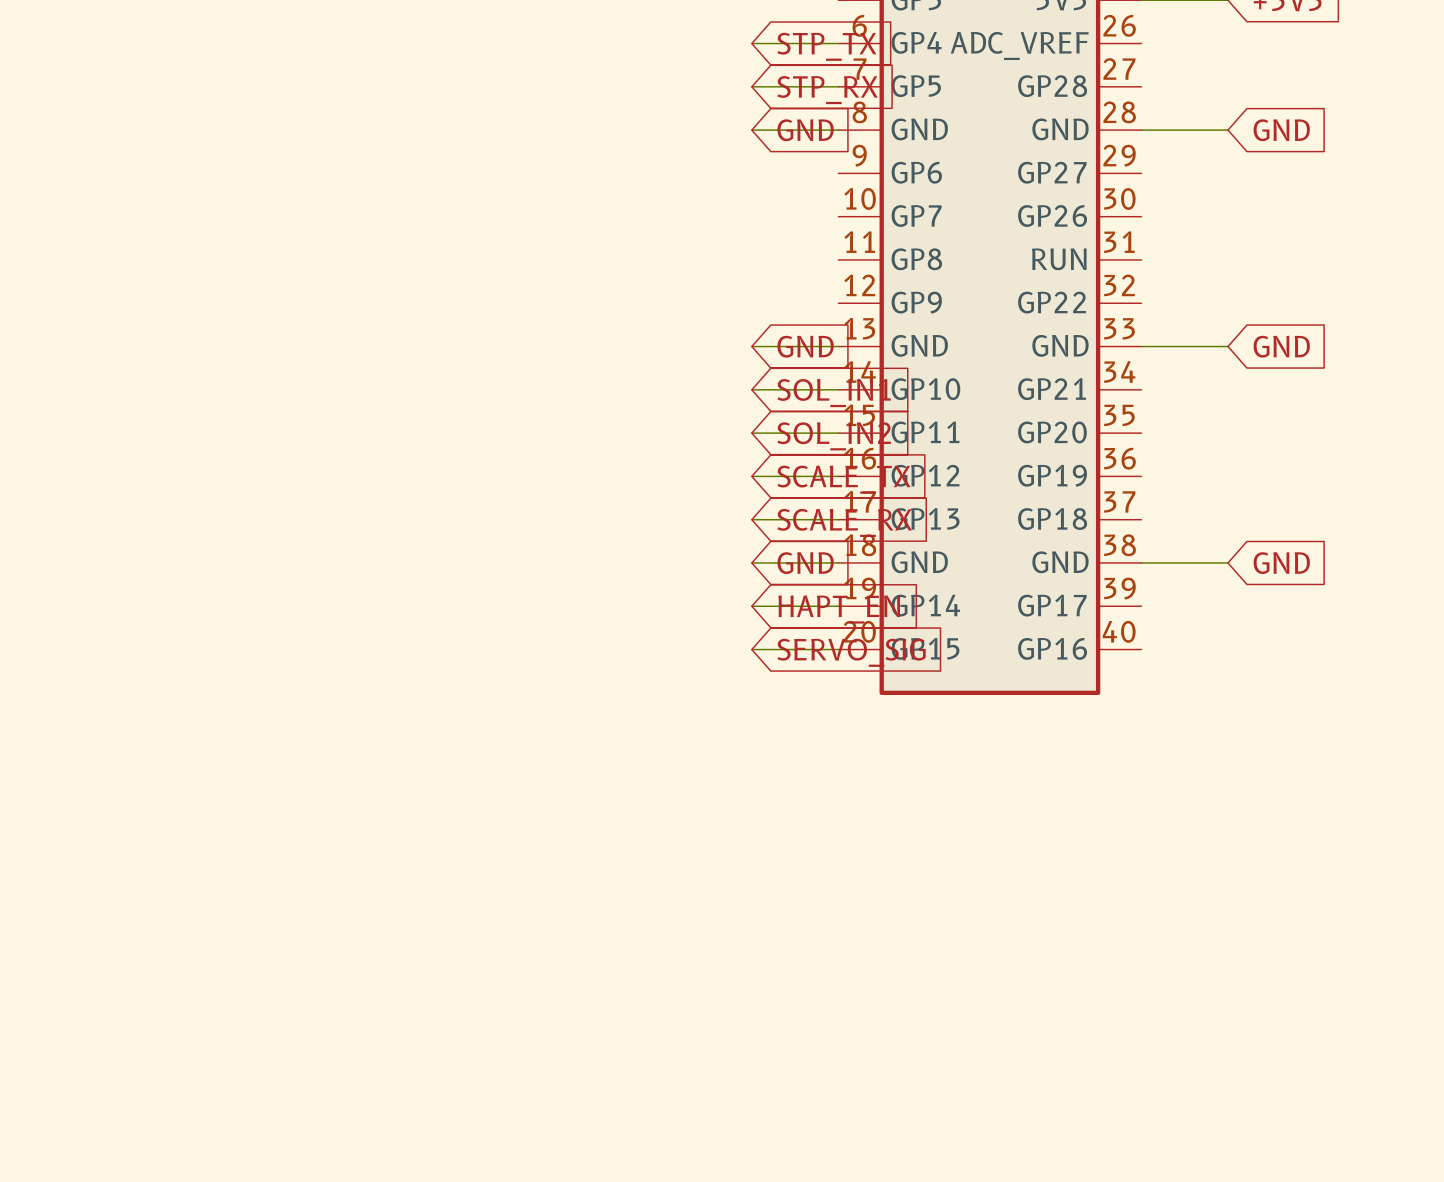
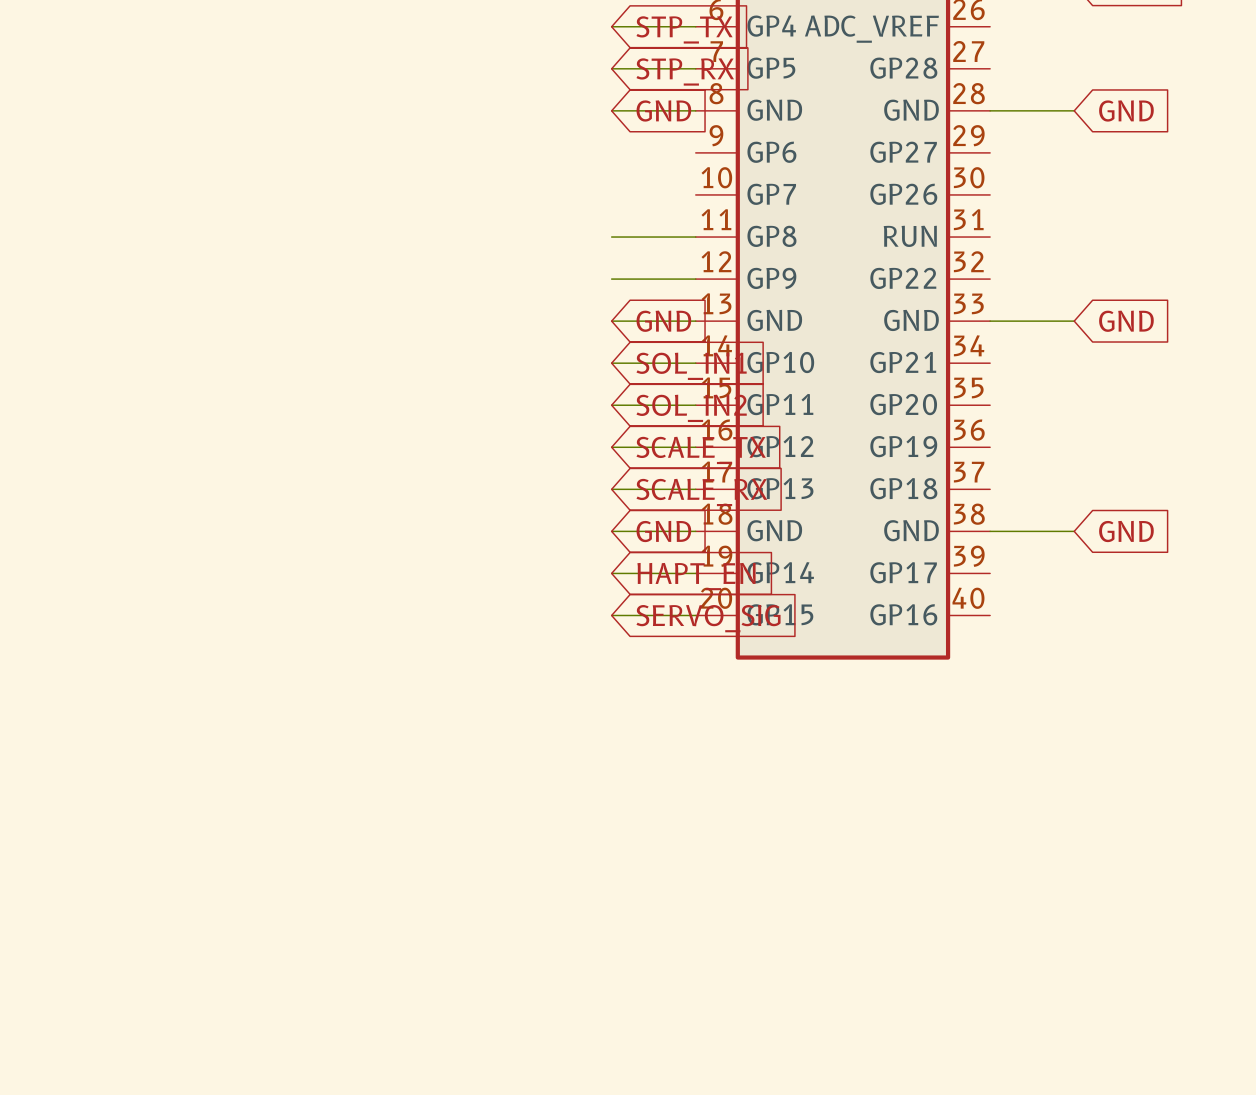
wire: none -> (611, 237) (695, 237)
wire: none -> (611, 279) (695, 279)

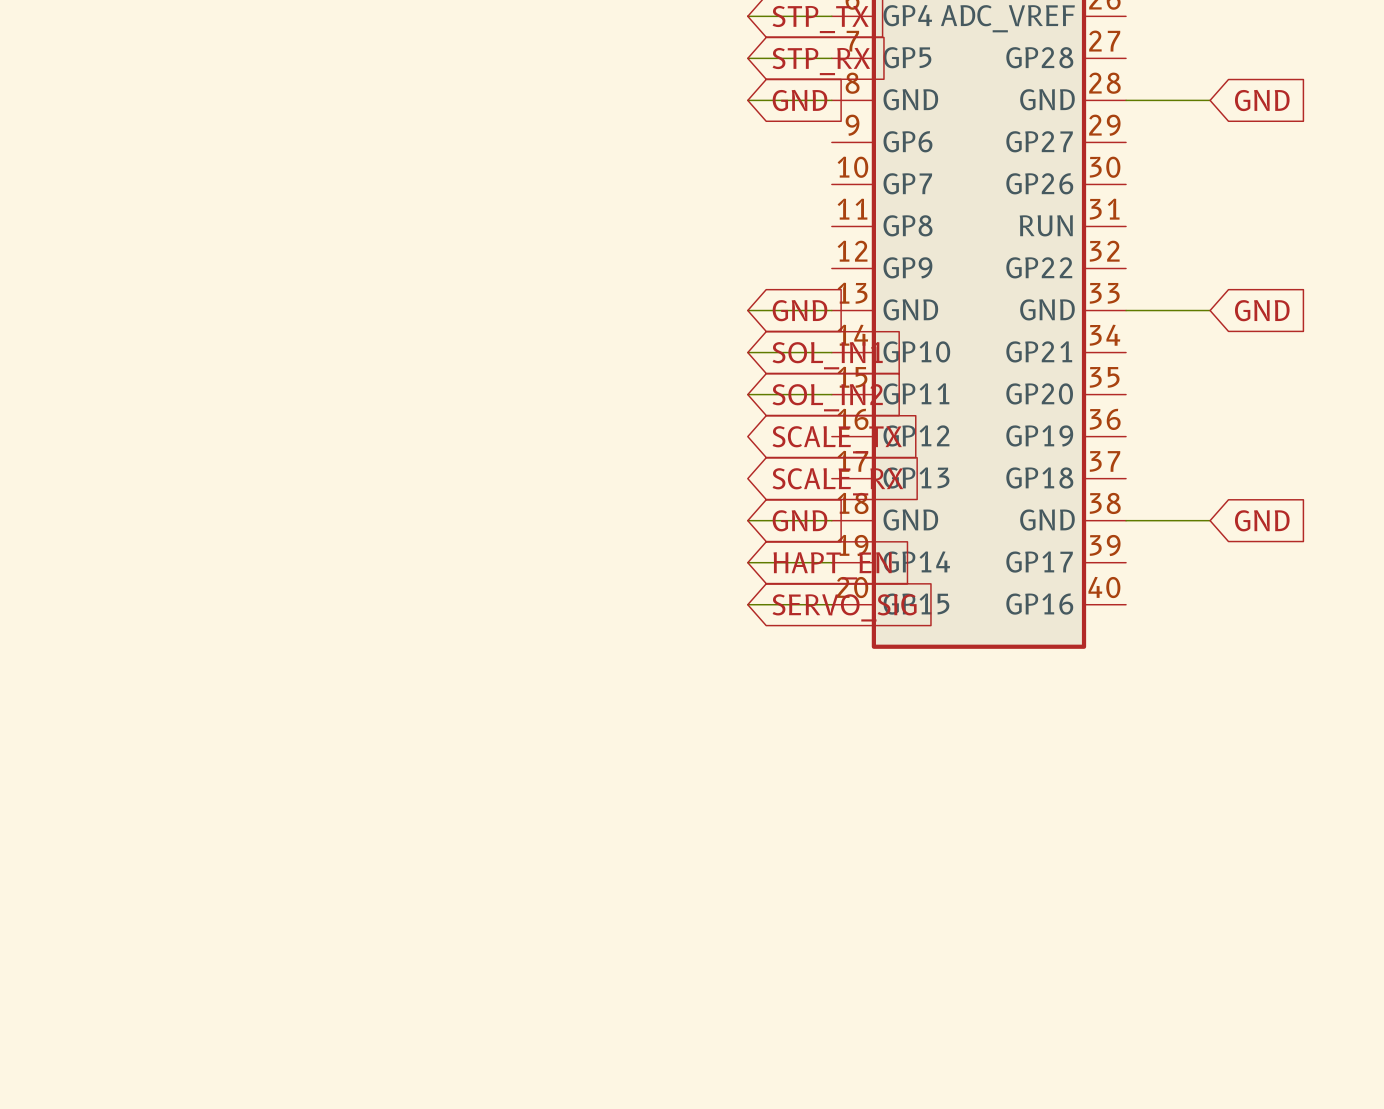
wire: (611, 237) (695, 237) -> none
wire: (611, 279) (695, 279) -> none
wire: (611, 447) (695, 447) -> none
wire: (611, 489) (695, 489) -> none

